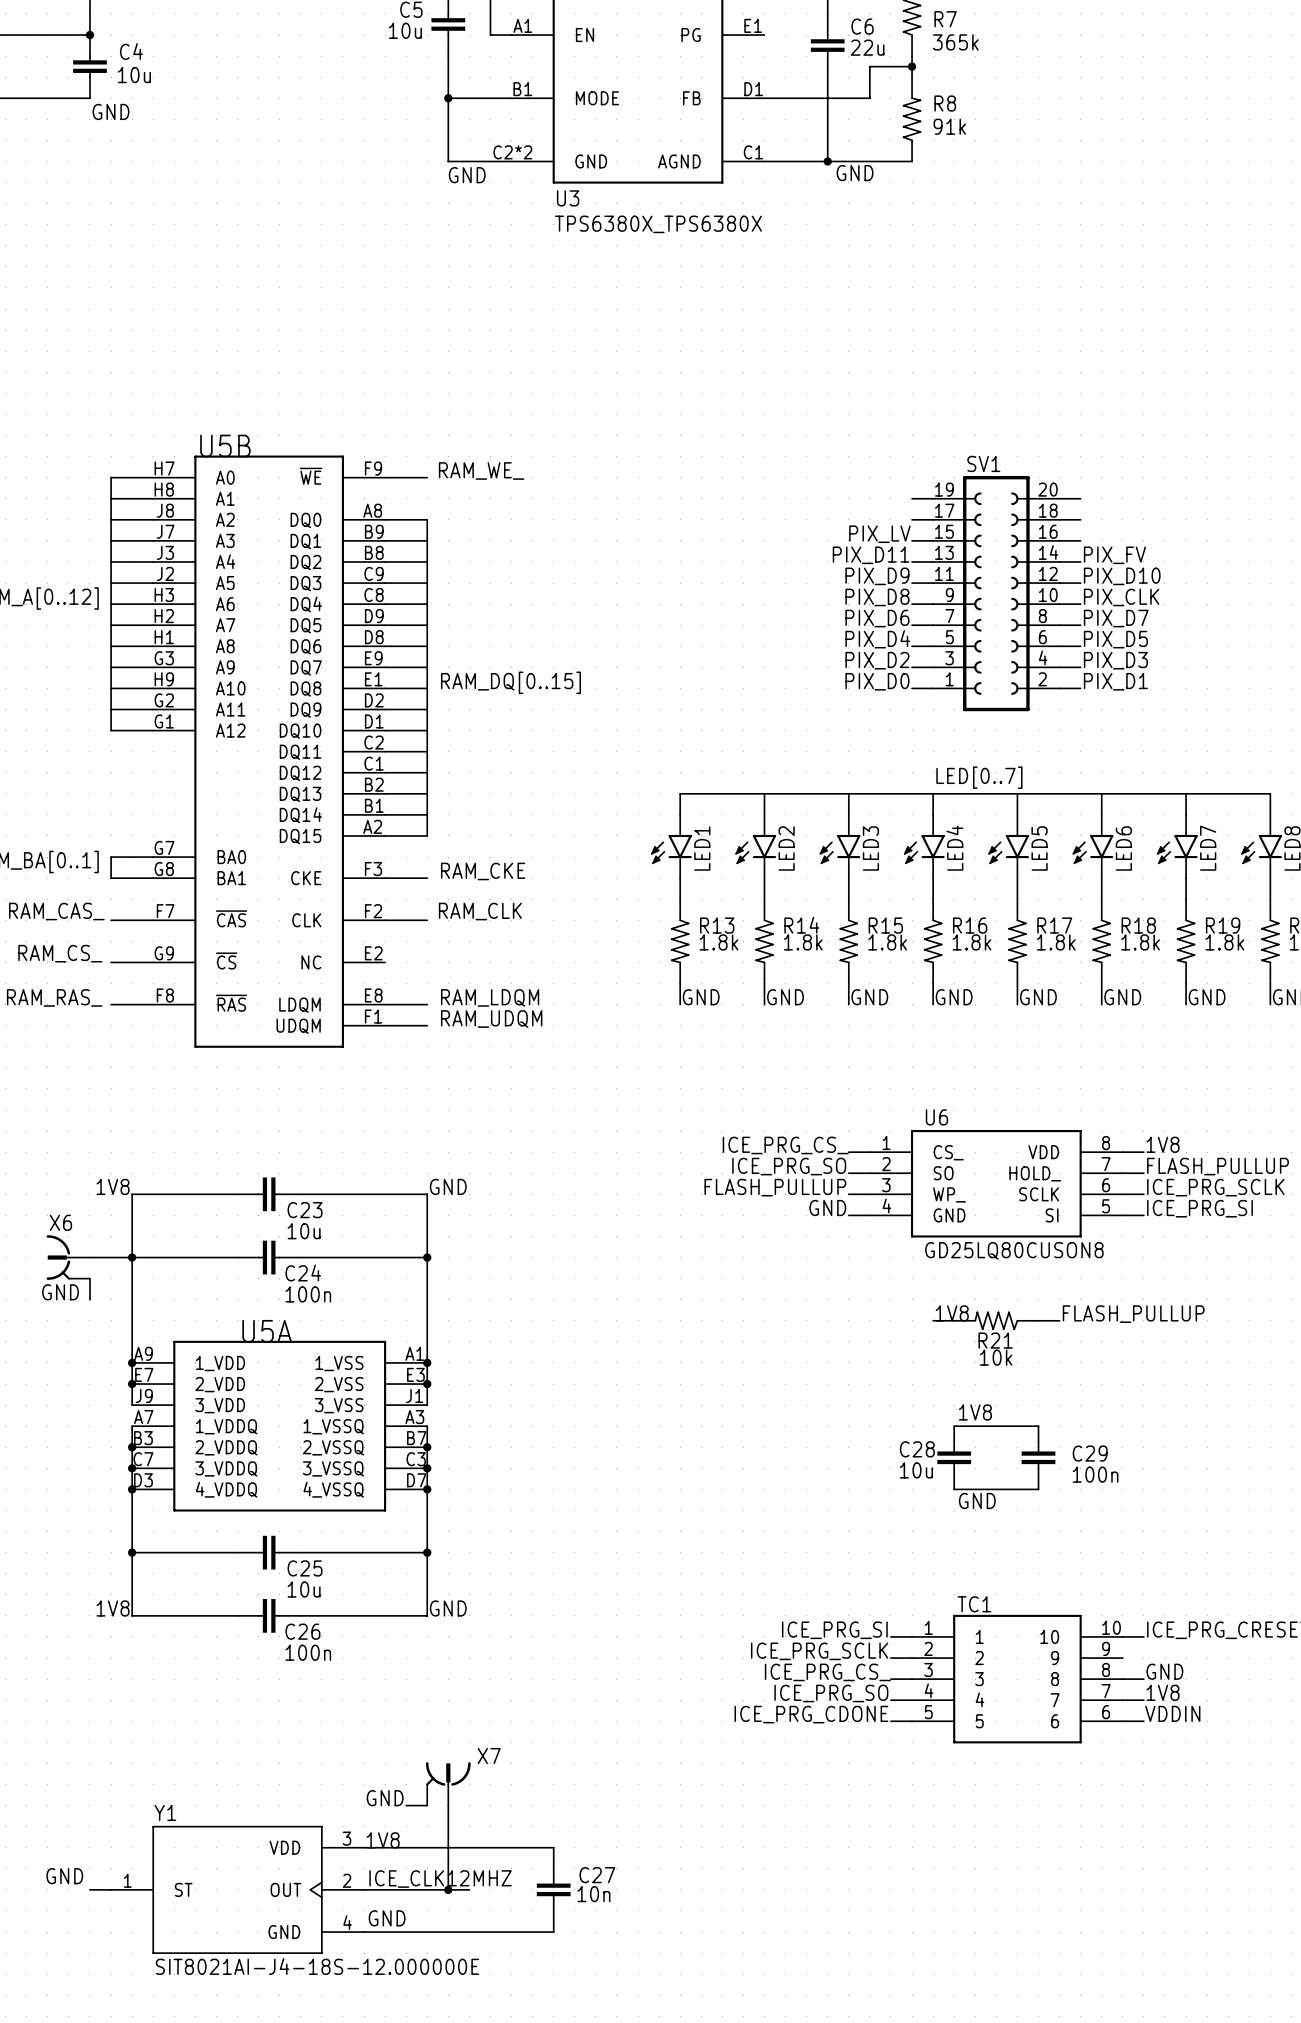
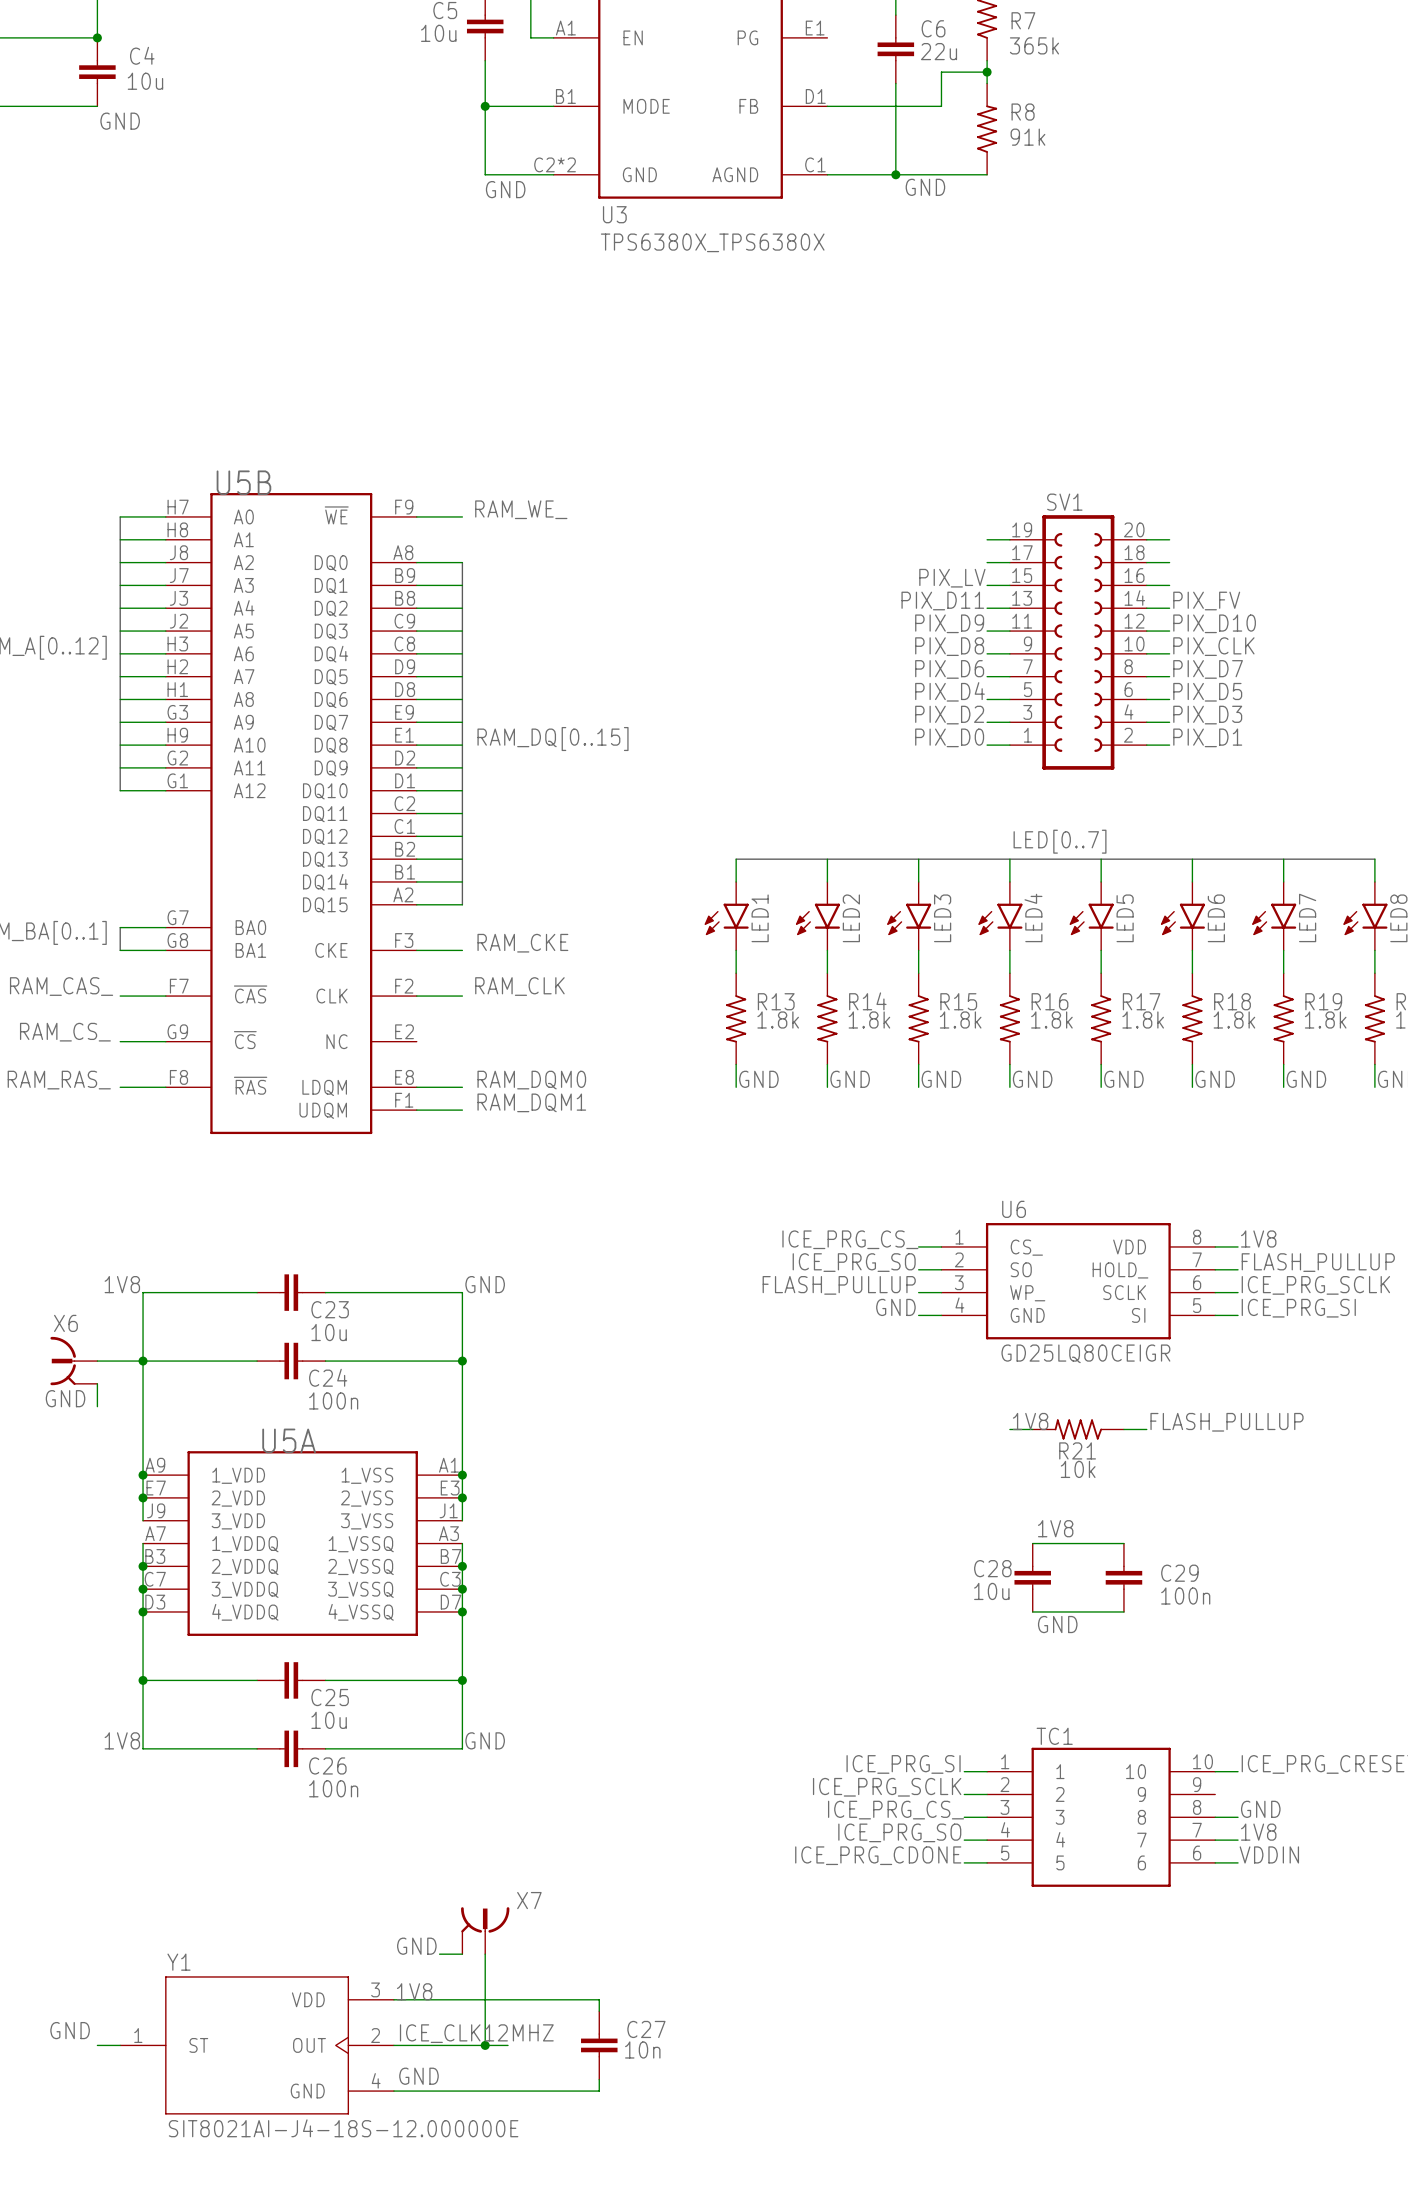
label: RAM_LDQM (490, 997) -> RAM_DQM0 (531, 1080)
label: RAM_UDQM (491, 1019) -> RAM_DQM1 (531, 1102)
U6 value: GD25LQ80CUSON8 (1014, 1250) -> GD25LQ80CEIGR (1085, 1353)

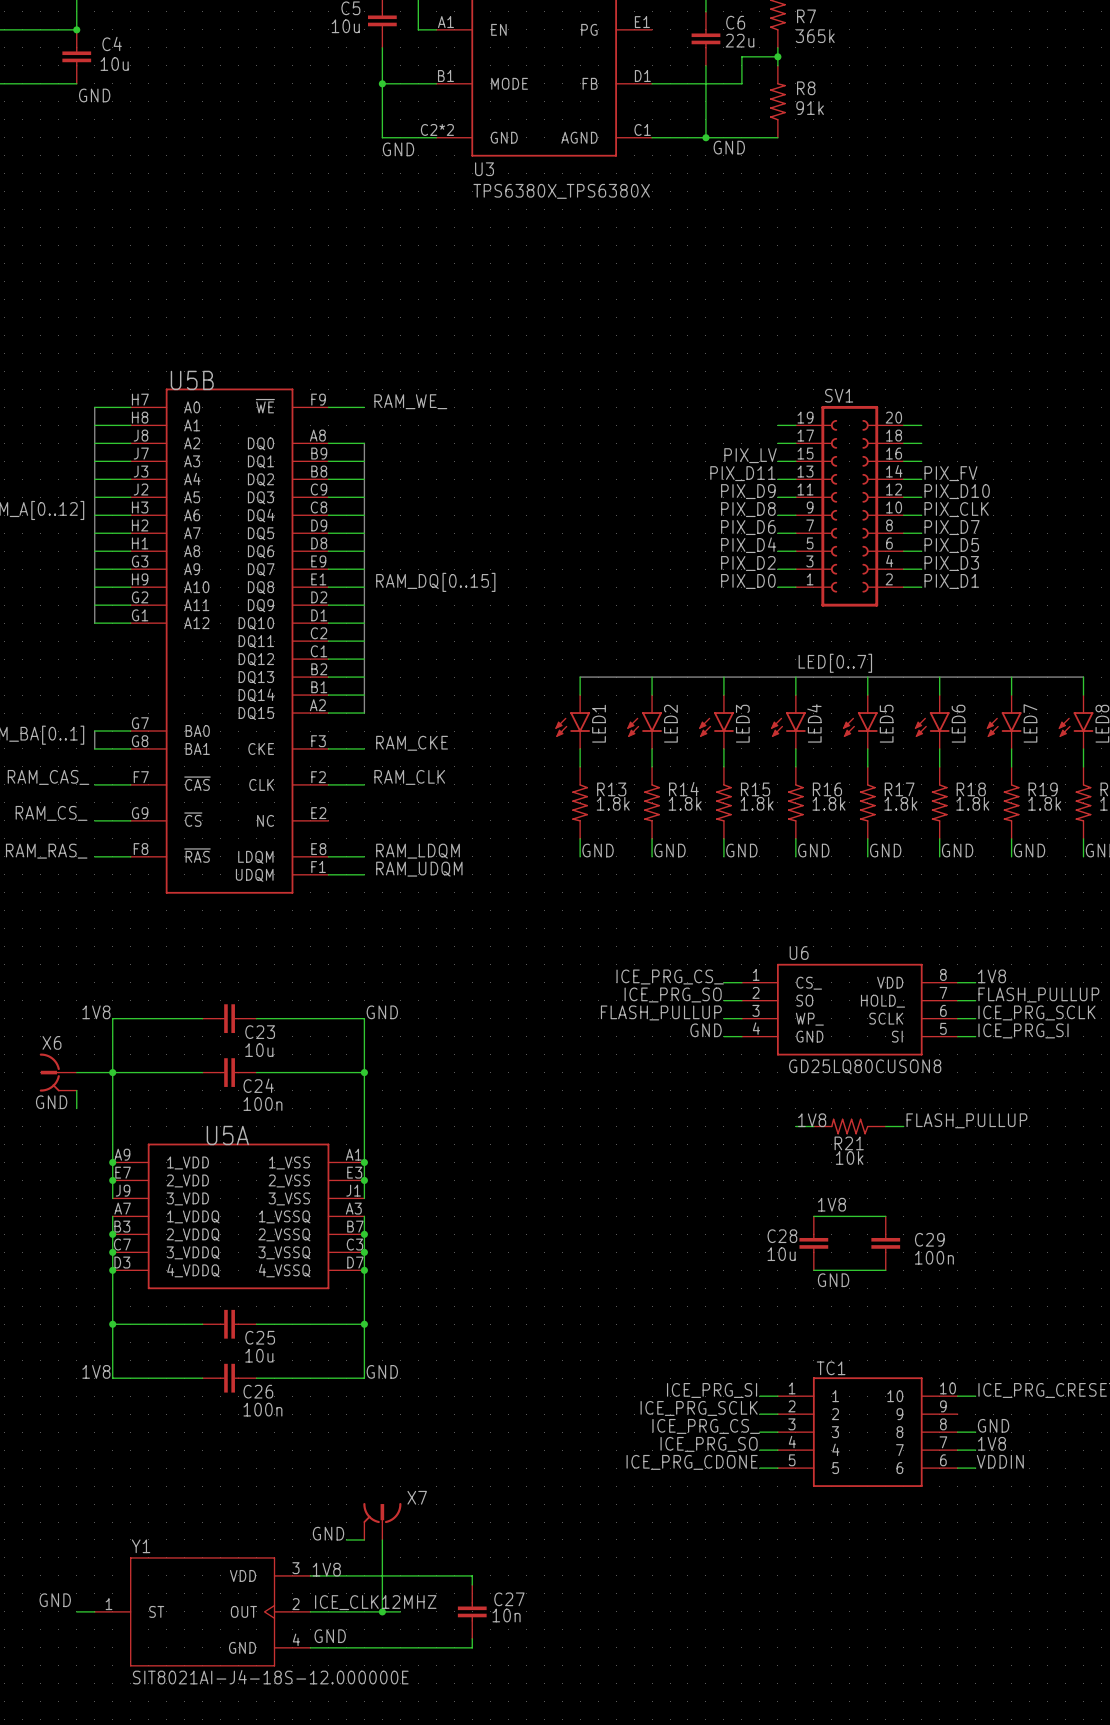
label: RAM_DQM0 (531, 1080) -> RAM_LDQM (418, 851)
label: RAM_DQM1 (531, 1102) -> RAM_UDQM (419, 869)
U6 value: GD25LQ80CEIGR (1085, 1353) -> GD25LQ80CUSON8 (865, 1066)

